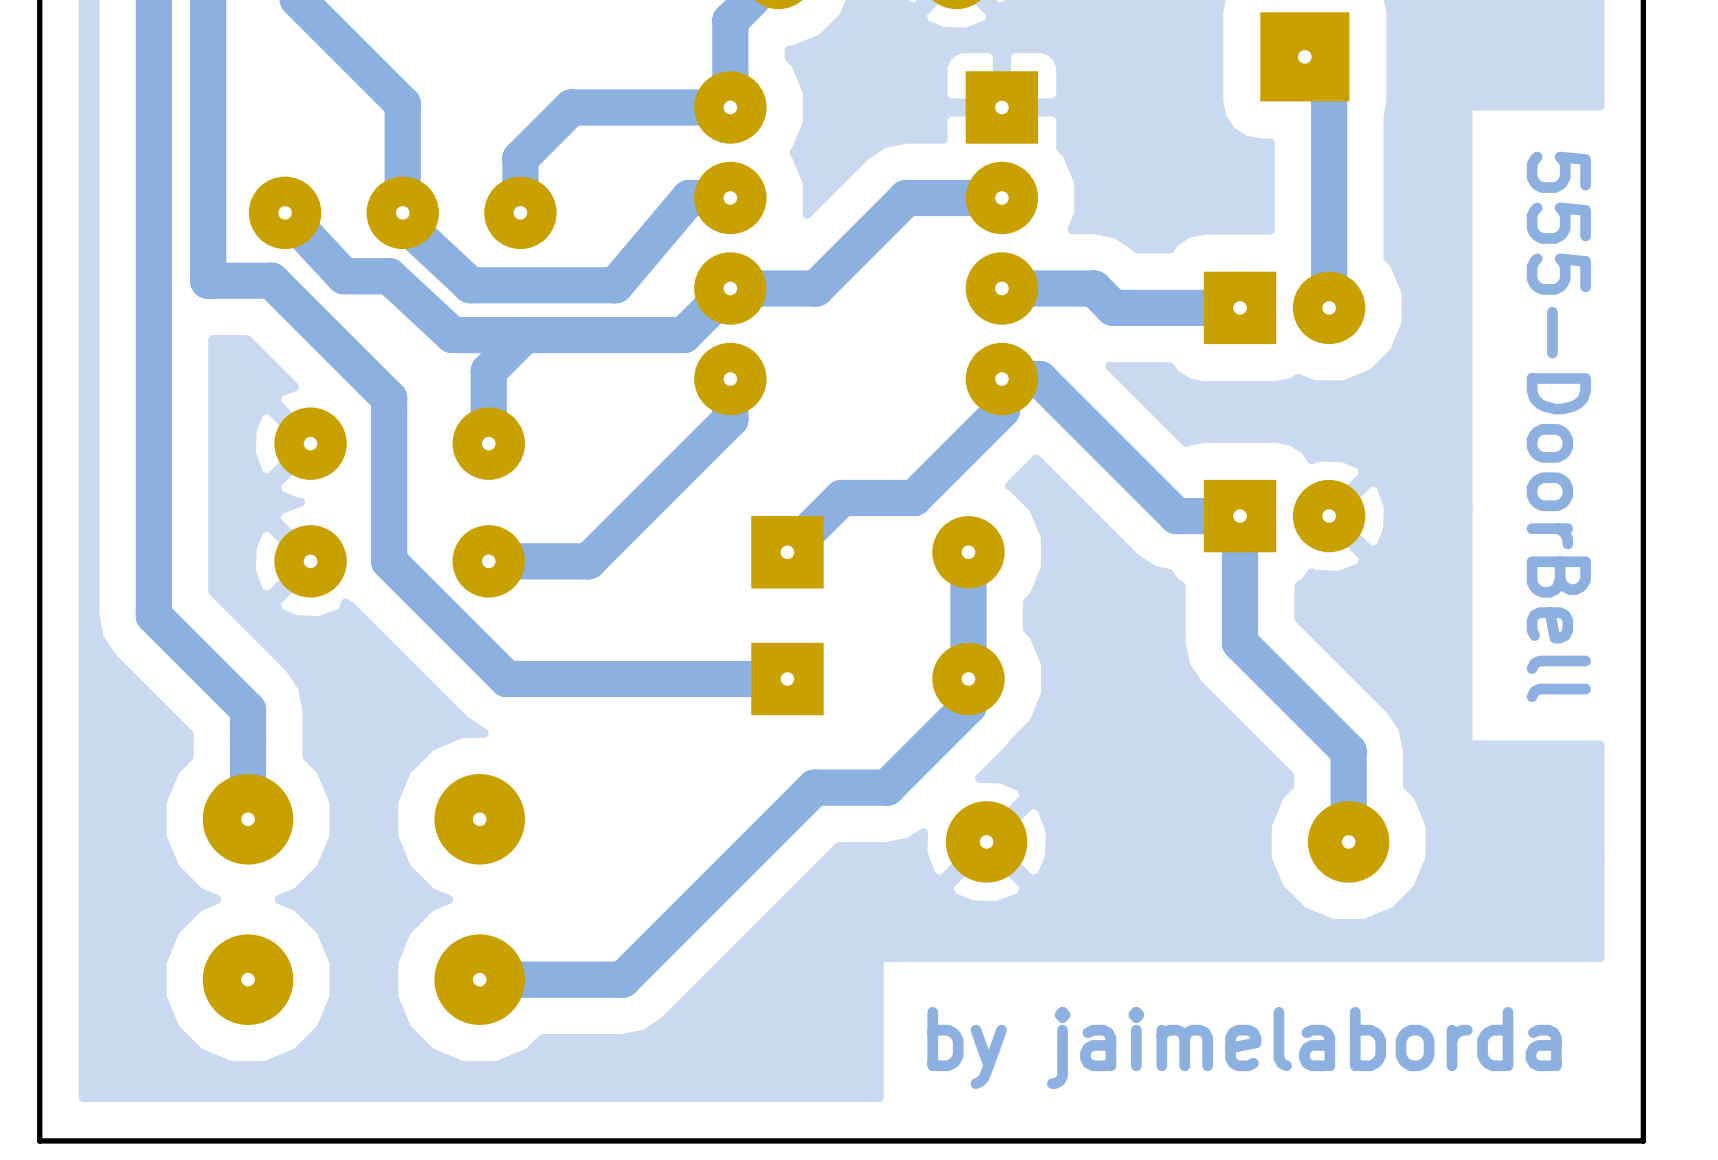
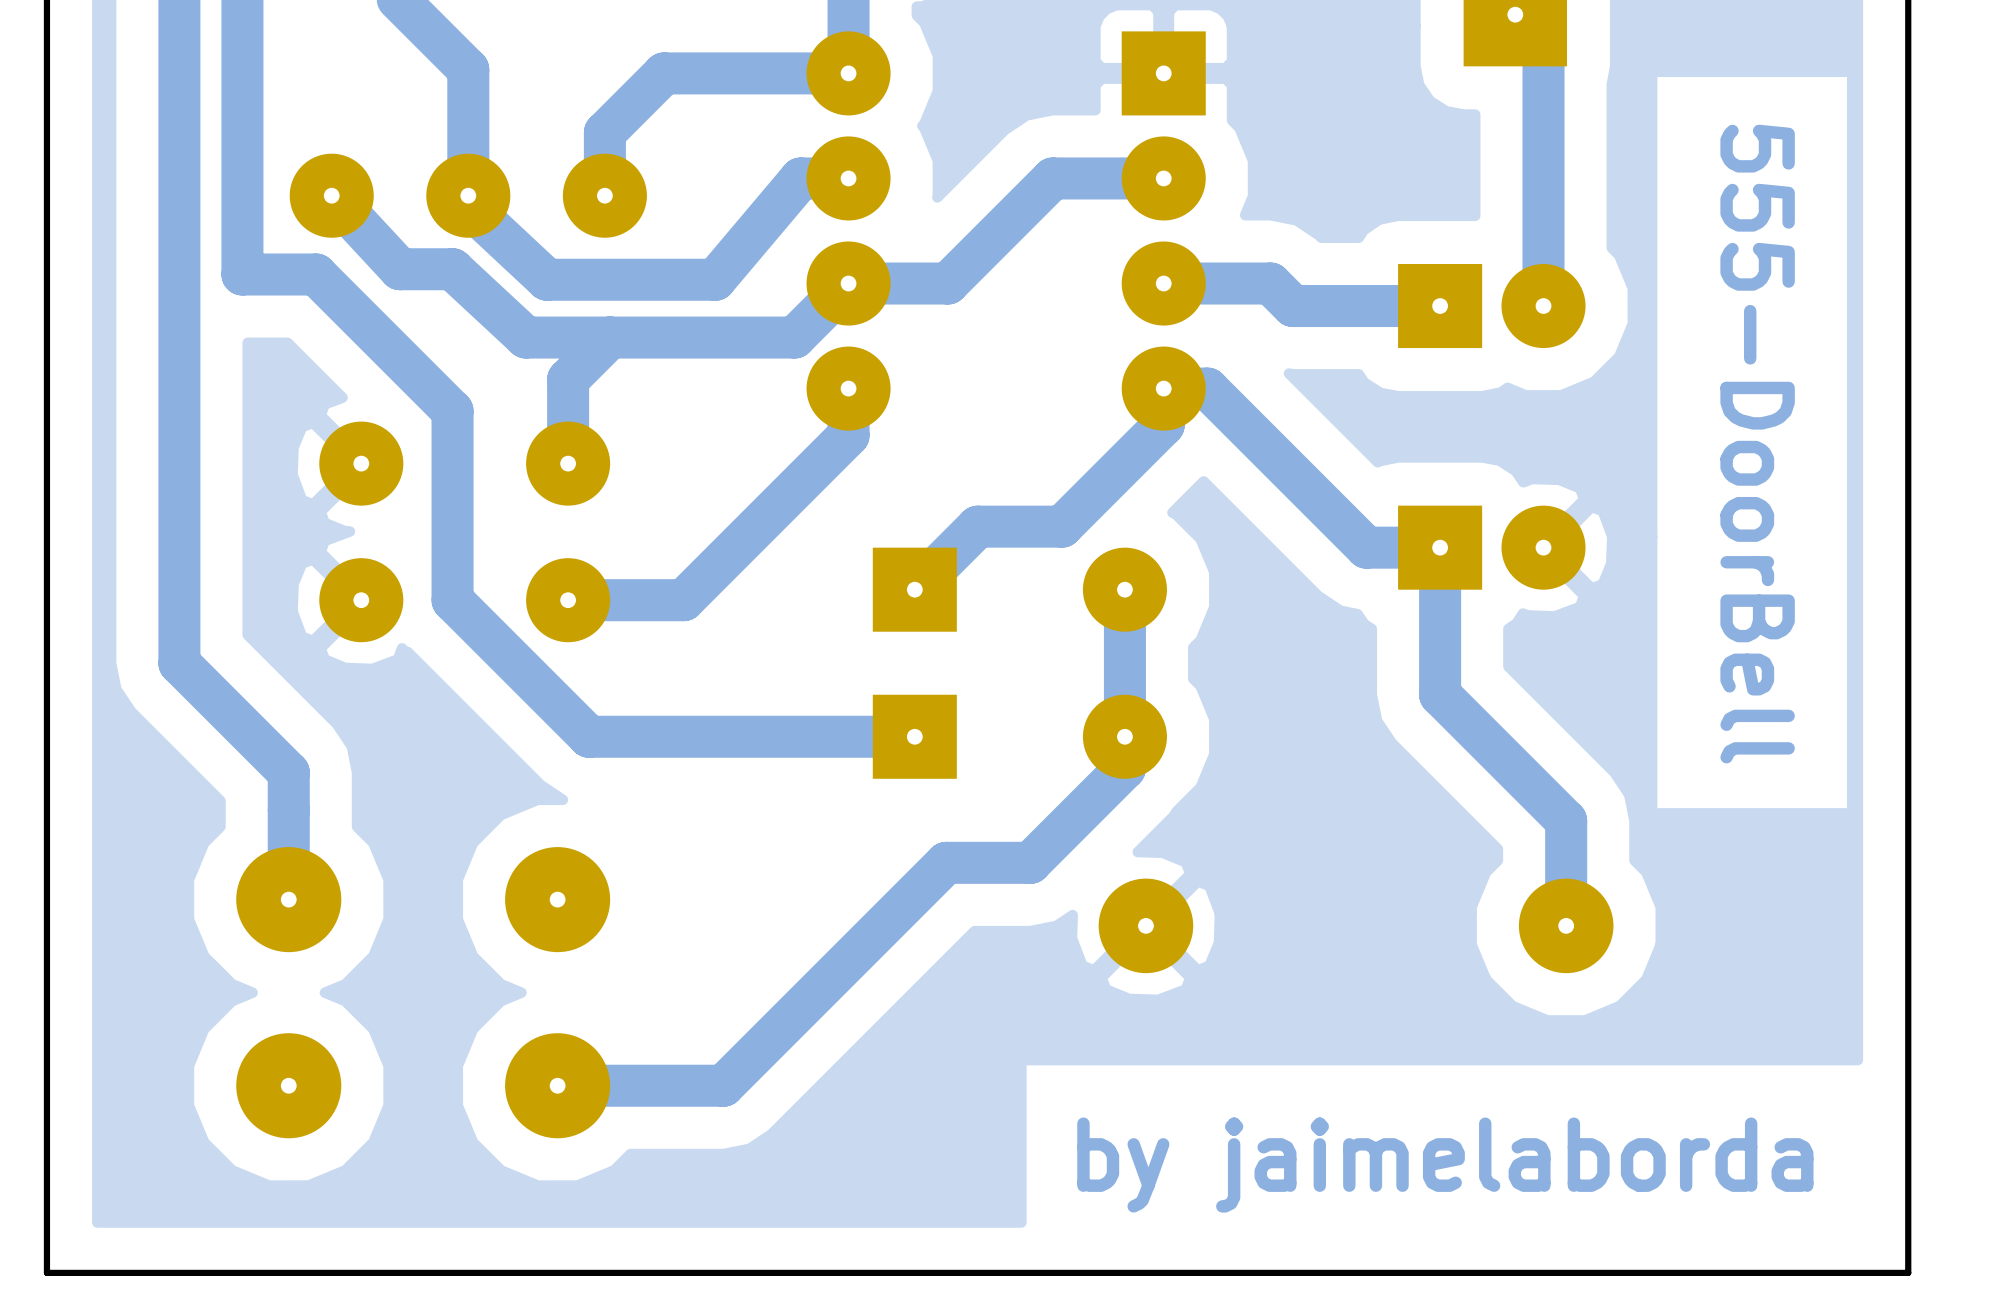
text position: 555-DoorBell (1558, 426) -> 555-DoorBell (1757, 444)

